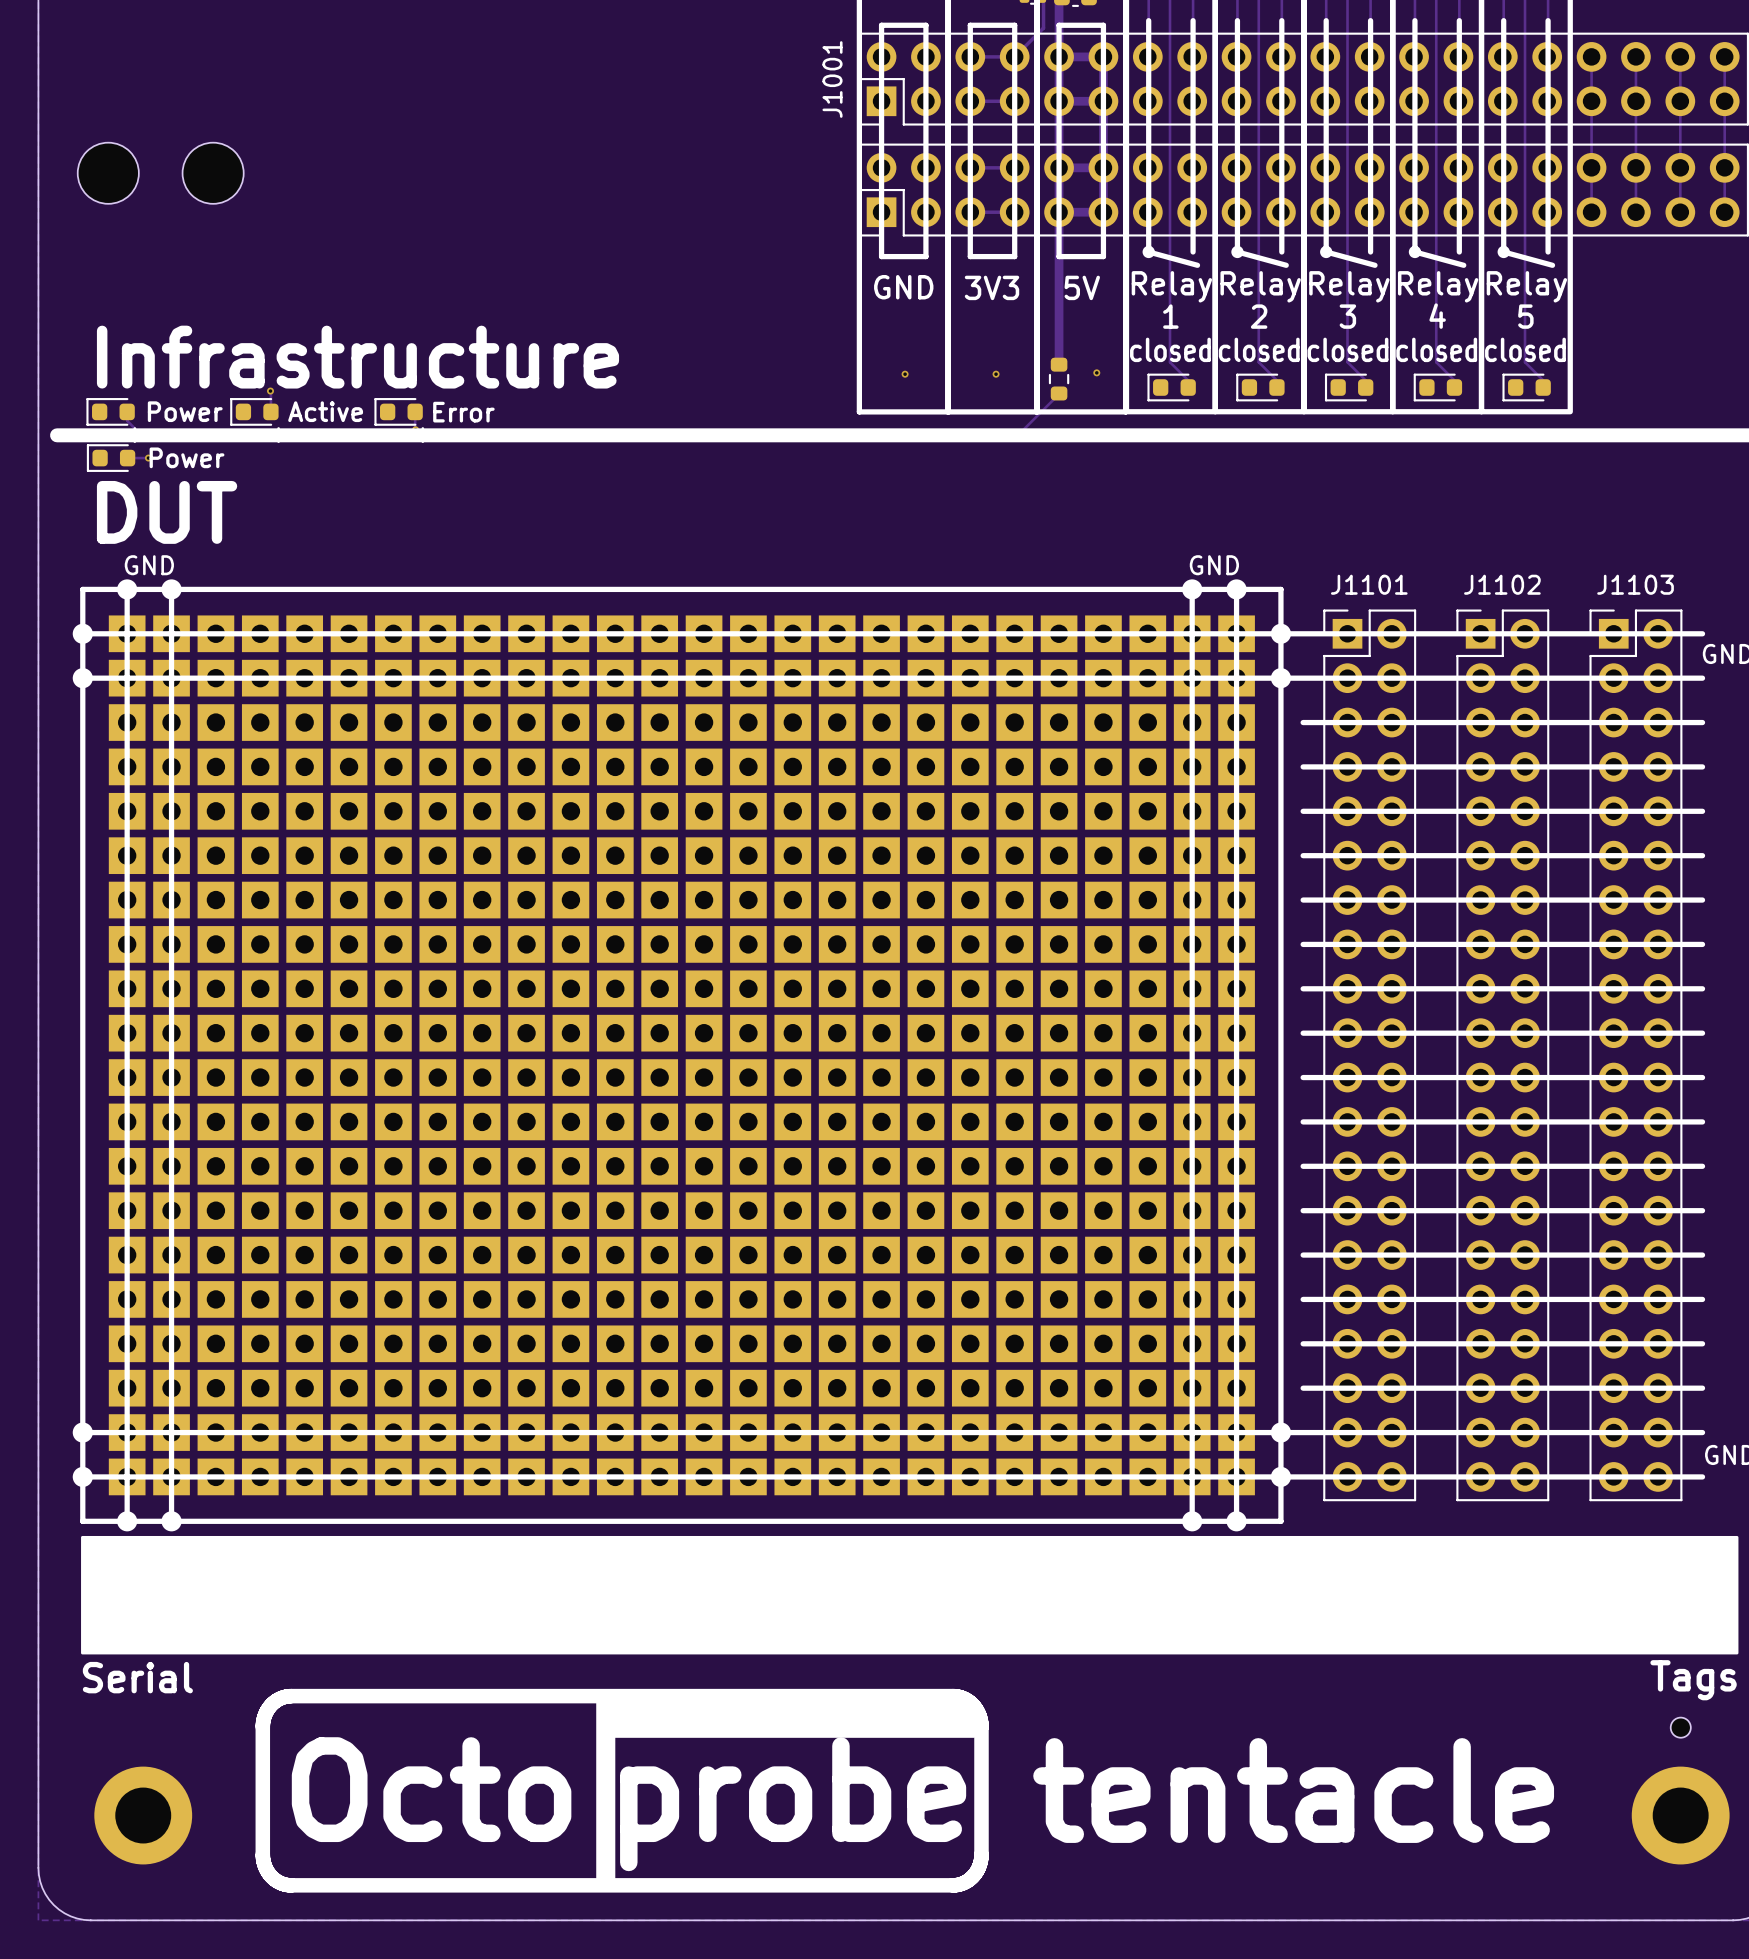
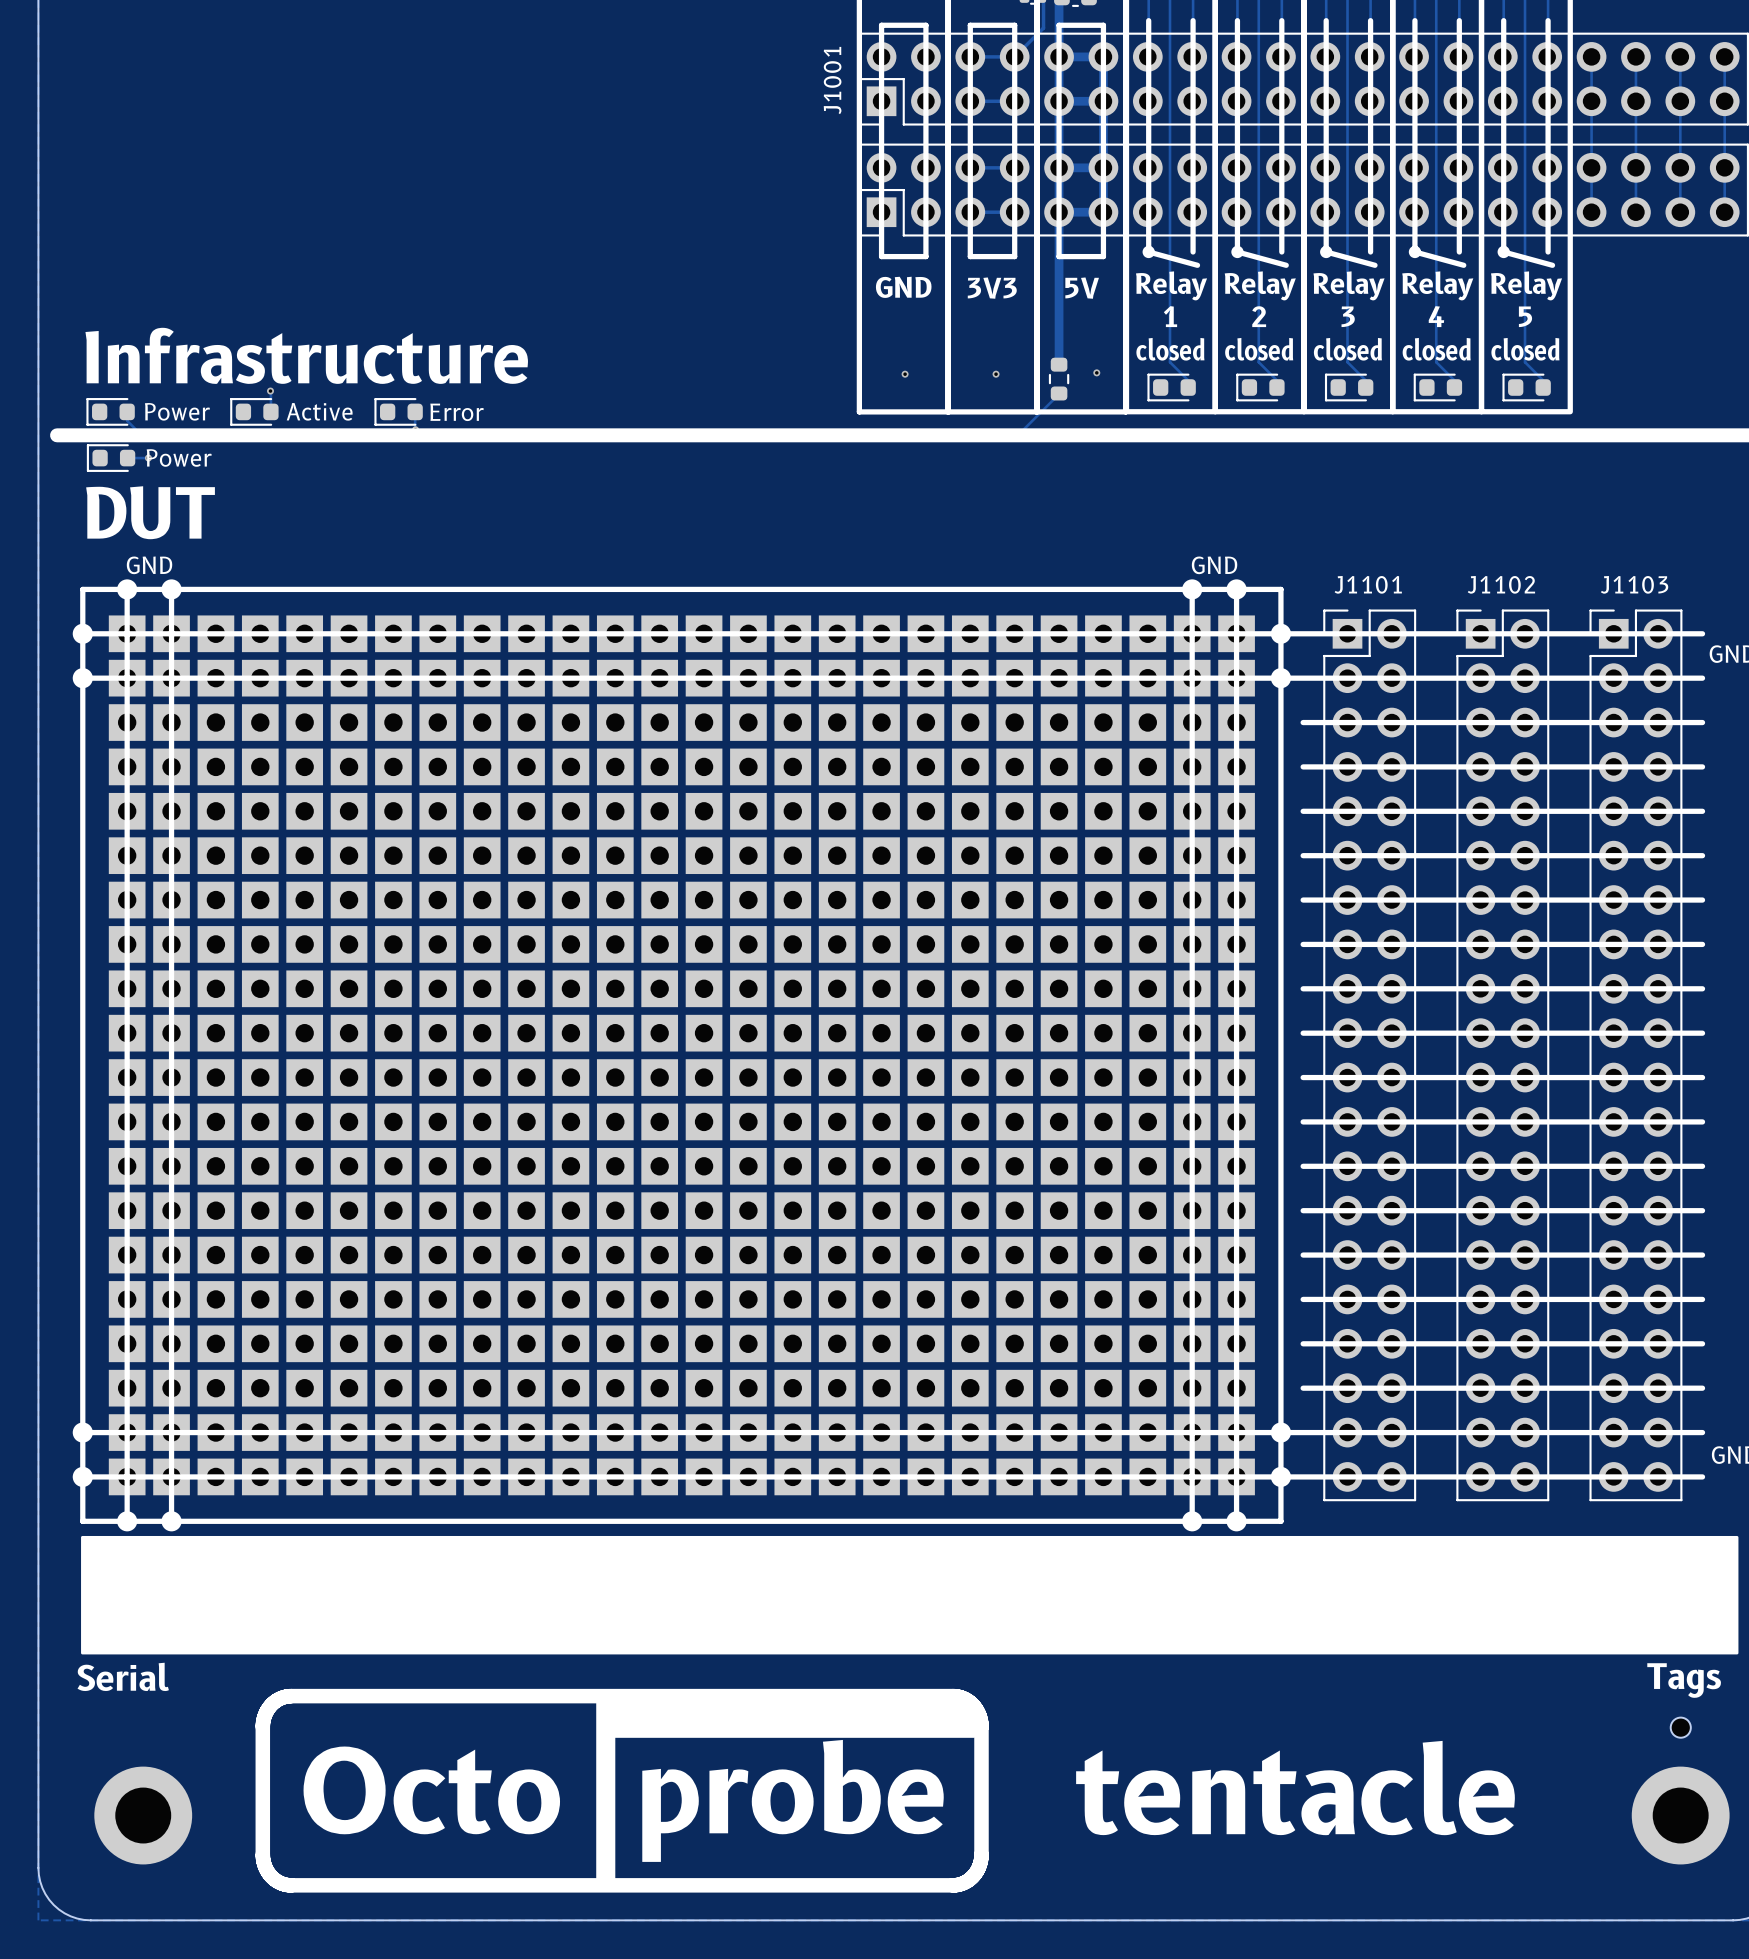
part: (108, 173) -> none
part: (213, 173) -> none

